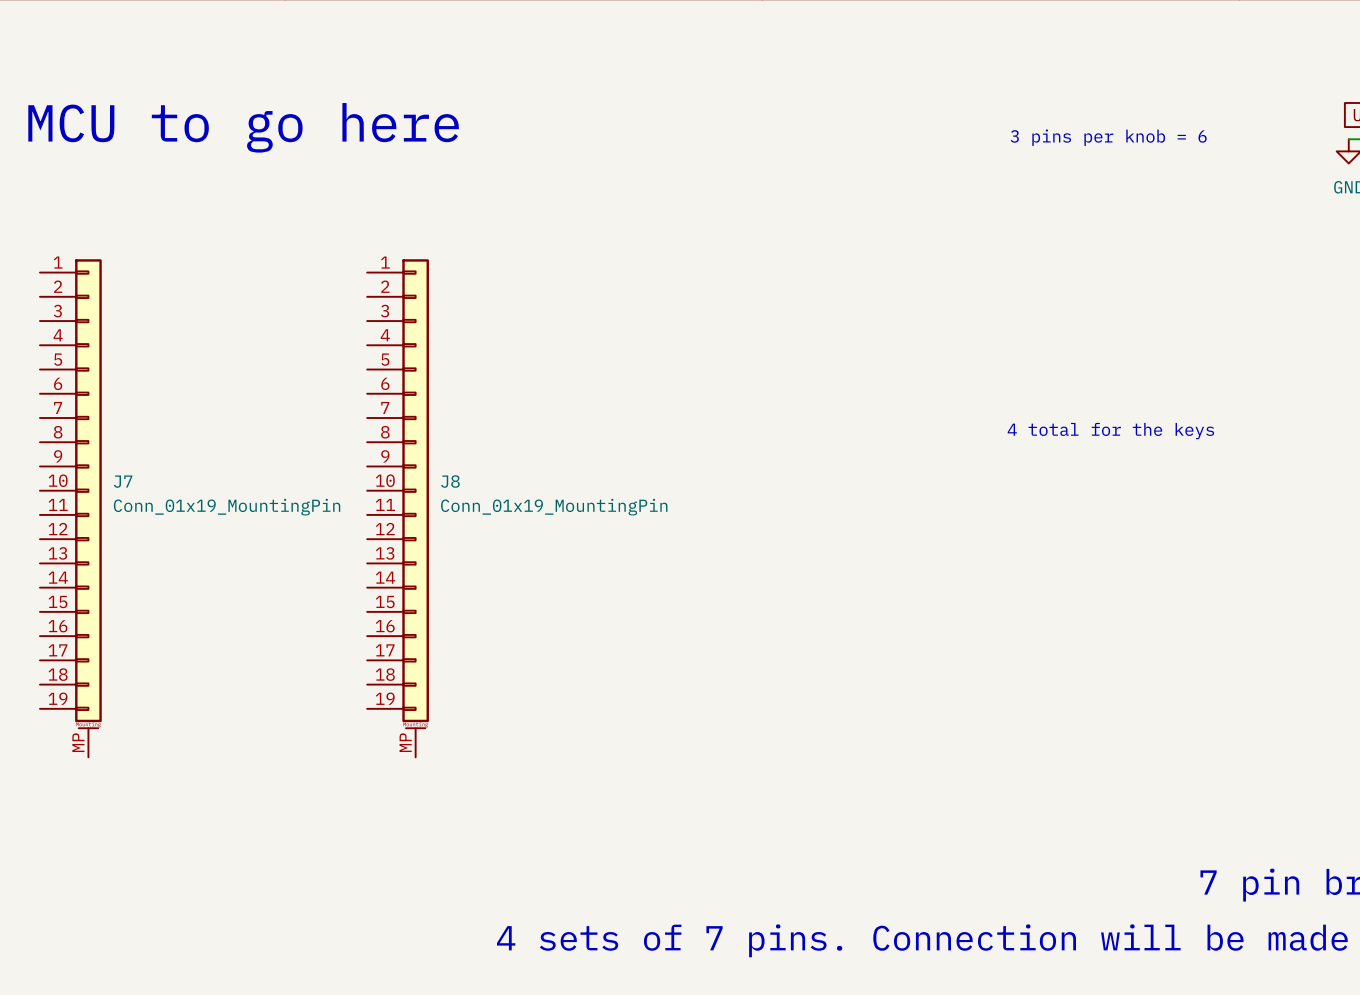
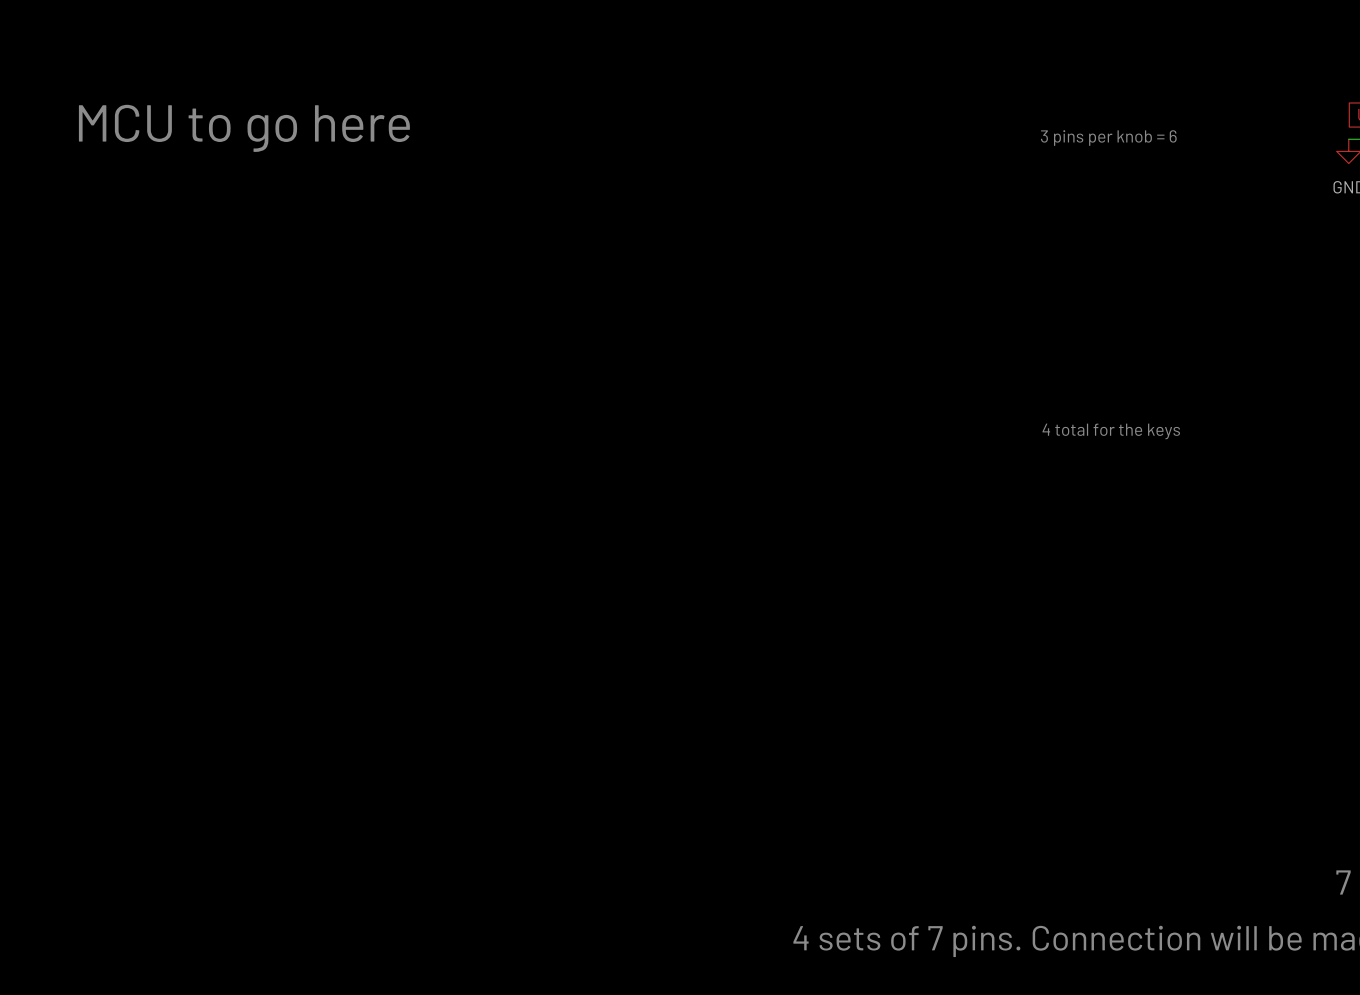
J7: Conn_01x19_MountingPin (70, 508) -> none
J8: Conn_01x19_MountingPin (398, 508) -> none

